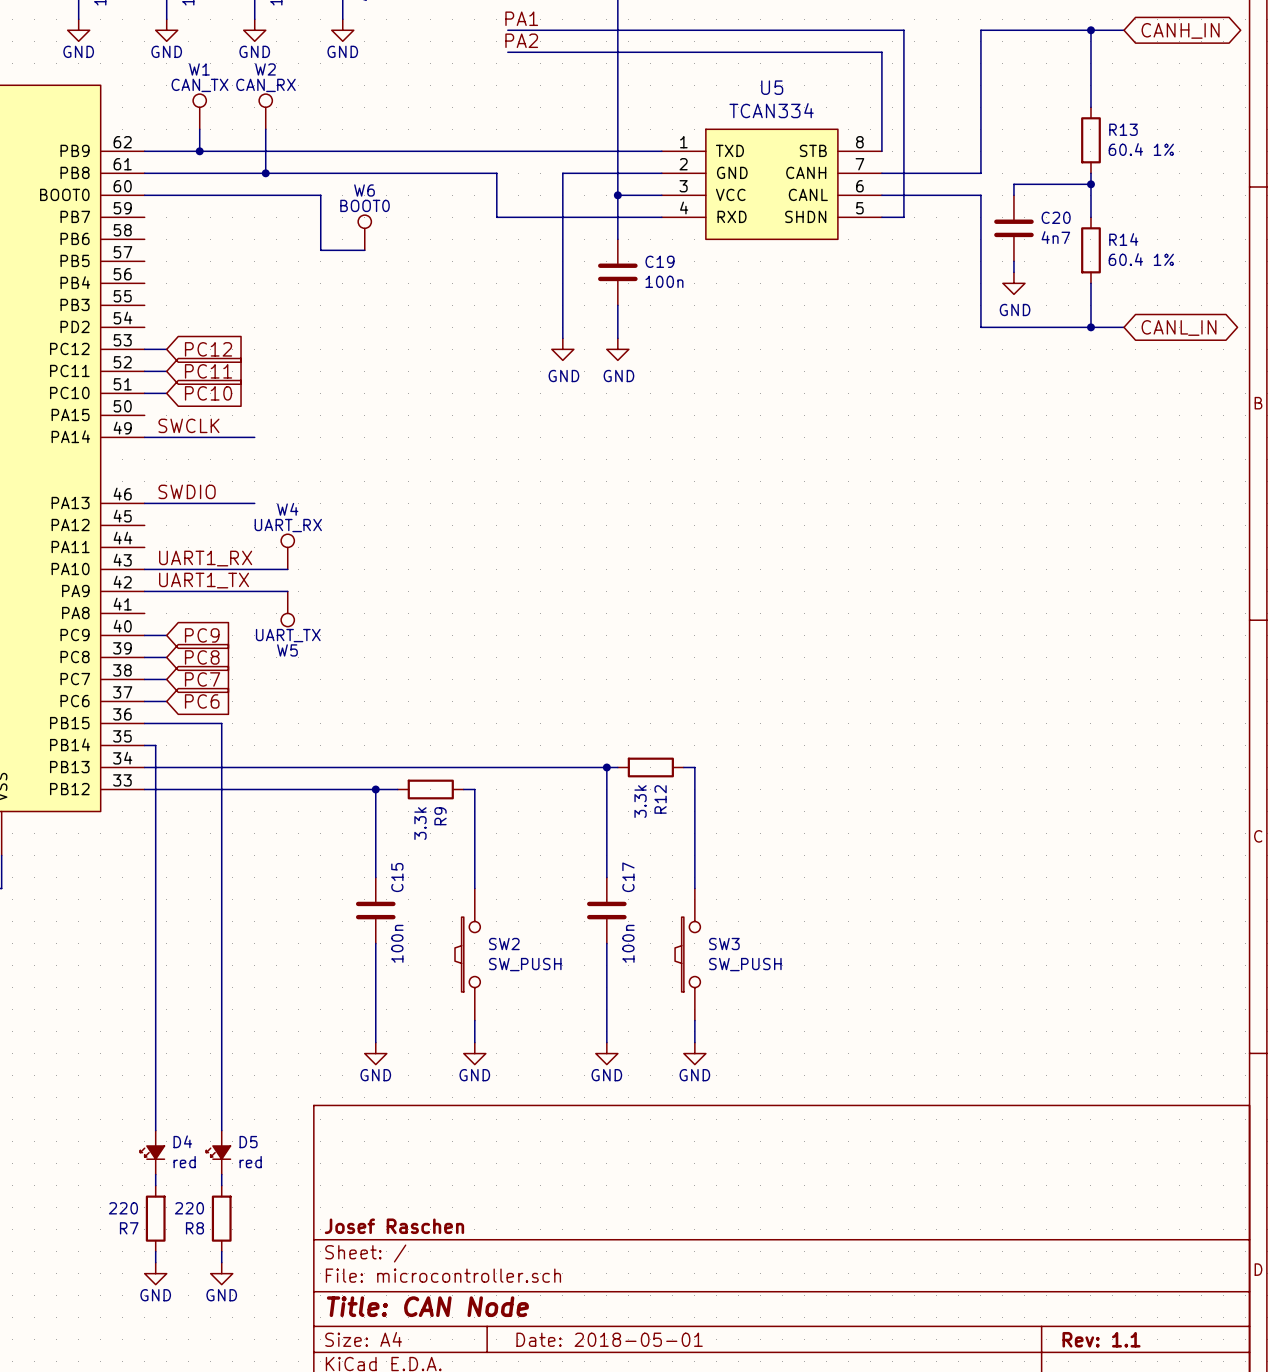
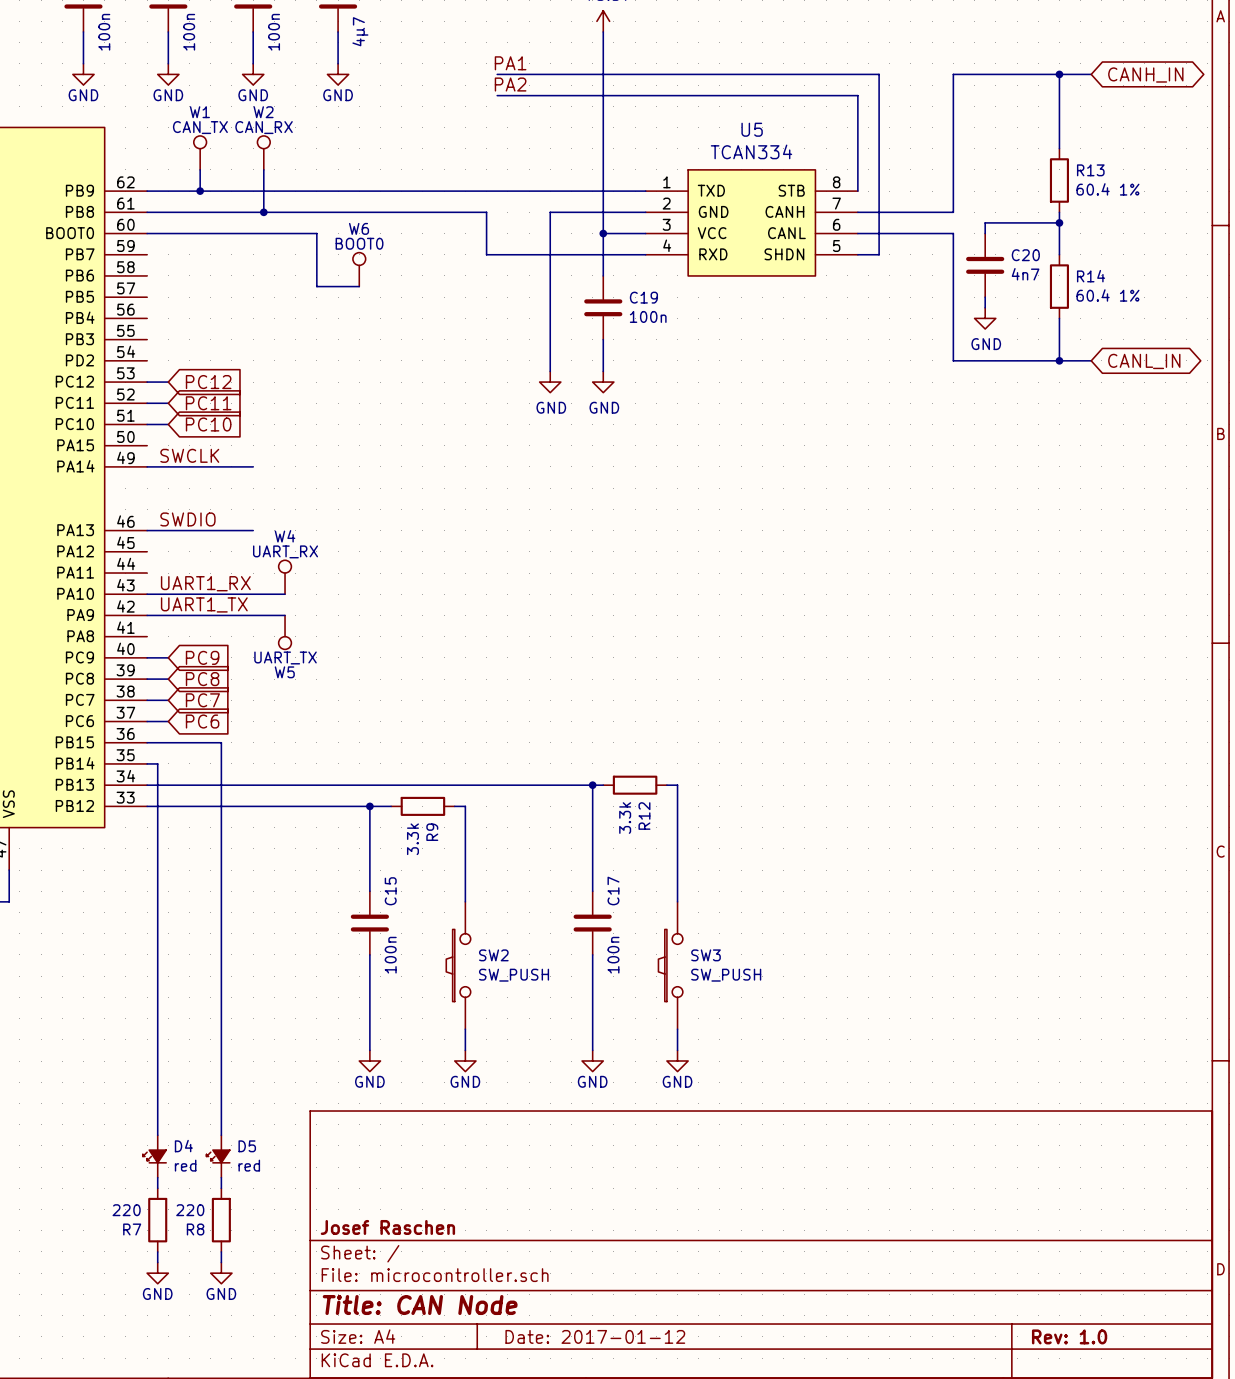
title block: Date: 2018-05-01 (609, 1339) -> Date: 2017-01-12 (595, 1336)
title block: Rev: 1.1 (1101, 1339) -> Rev: 1.0 (1069, 1336)

